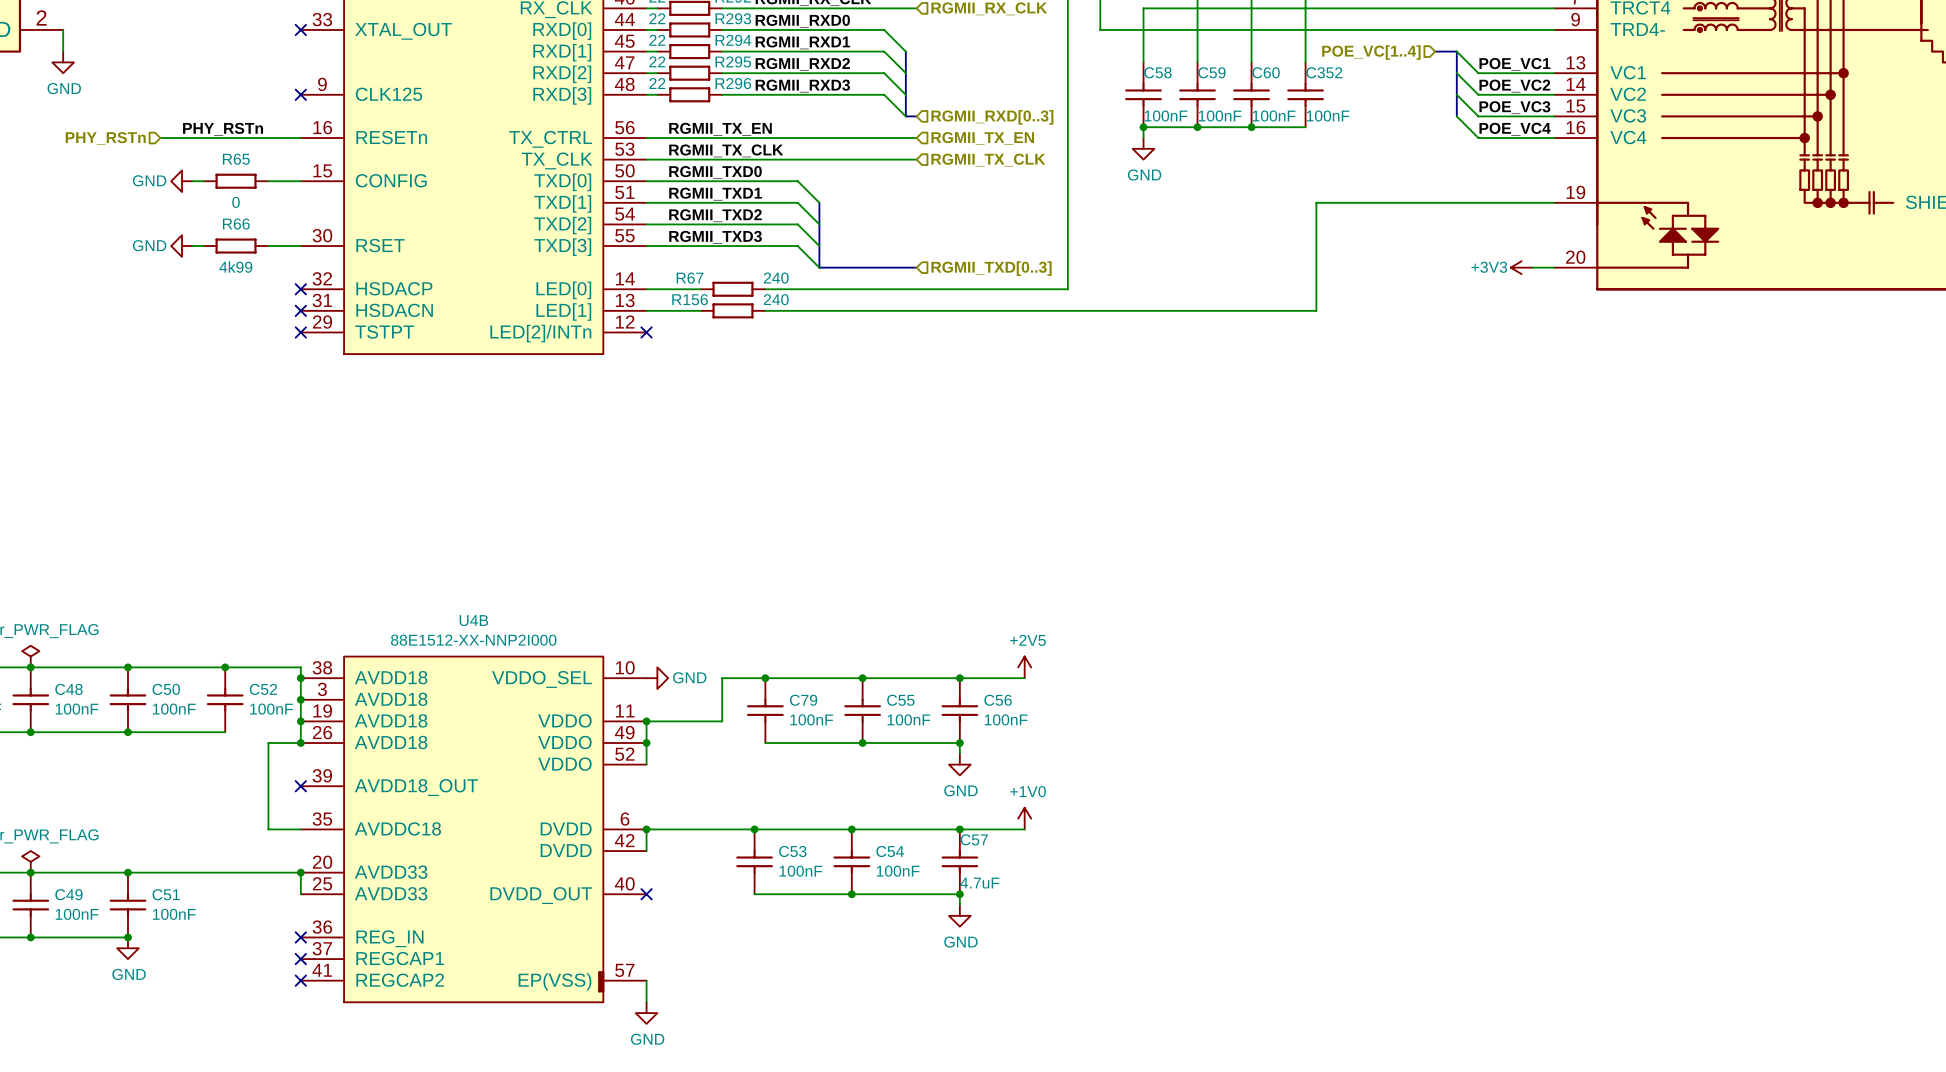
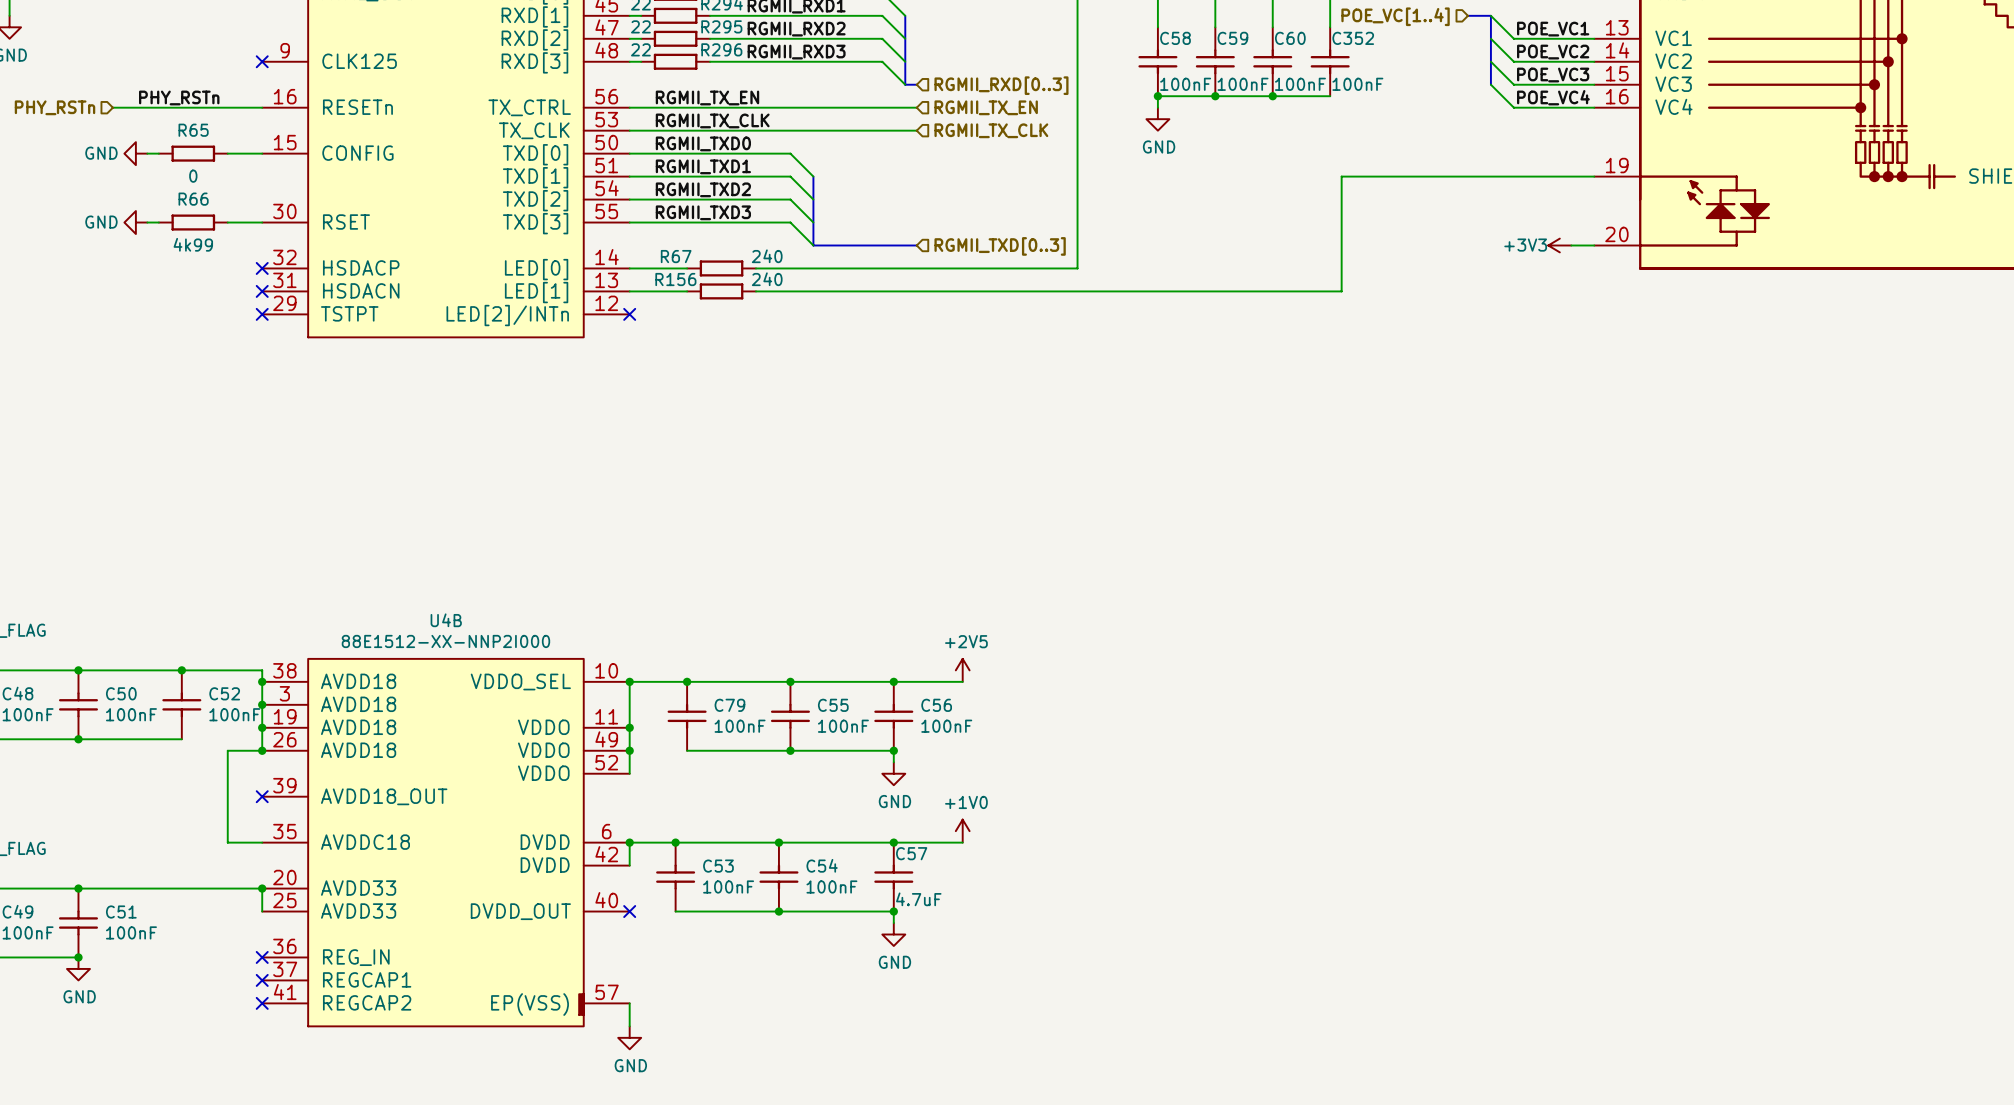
power symbol position: +2V5 (1024, 667) -> +2V5 (962, 670)
junction: none -> (629, 681)
power symbol: GND (657, 678) -> none
junction: none -> (687, 681)
wire: (722, 678) (722, 721) (646, 721) -> (710, 681) (629, 681) (629, 727)
junction: (765, 678) -> none
junction: none -> (790, 681)
junction: (862, 678) -> none
junction: none -> (893, 681)
wire: (959, 678) (1024, 678) -> none
junction: (959, 678) -> none
C79 position: (765, 710) -> (687, 716)
C55 position: (862, 710) -> (790, 716)
C56 position: (959, 710) -> (893, 716)
wire: none -> (687, 750) (756, 750)
junction: none -> (790, 750)
junction: (862, 743) -> none
wire: (895, 743) (959, 743) (959, 753) -> (893, 750) (893, 762)
junction: none -> (893, 750)
junction: (959, 743) -> none
power symbol position: GND (959, 764) -> GND (893, 773)
power symbol position: +1V0 (1024, 818) -> +1V0 (962, 831)
junction: none -> (675, 842)
junction: (754, 829) -> none
junction: none -> (778, 842)
junction: (851, 829) -> none
junction: none -> (893, 842)
wire: (959, 829) (1024, 829) -> none
junction: (959, 829) -> none
C53 position: (754, 861) -> (675, 877)
C54 position: (851, 861) -> (778, 877)
C57 position: (959, 861) -> (893, 877)
wire: none -> (675, 911) (744, 911)
junction: none -> (778, 911)
junction: (851, 894) -> none
wire: (895, 894) (959, 894) (959, 905) -> (893, 911) (893, 923)
junction: none -> (893, 911)
junction: (959, 894) -> none
power symbol position: GND (959, 915) -> GND (893, 934)

